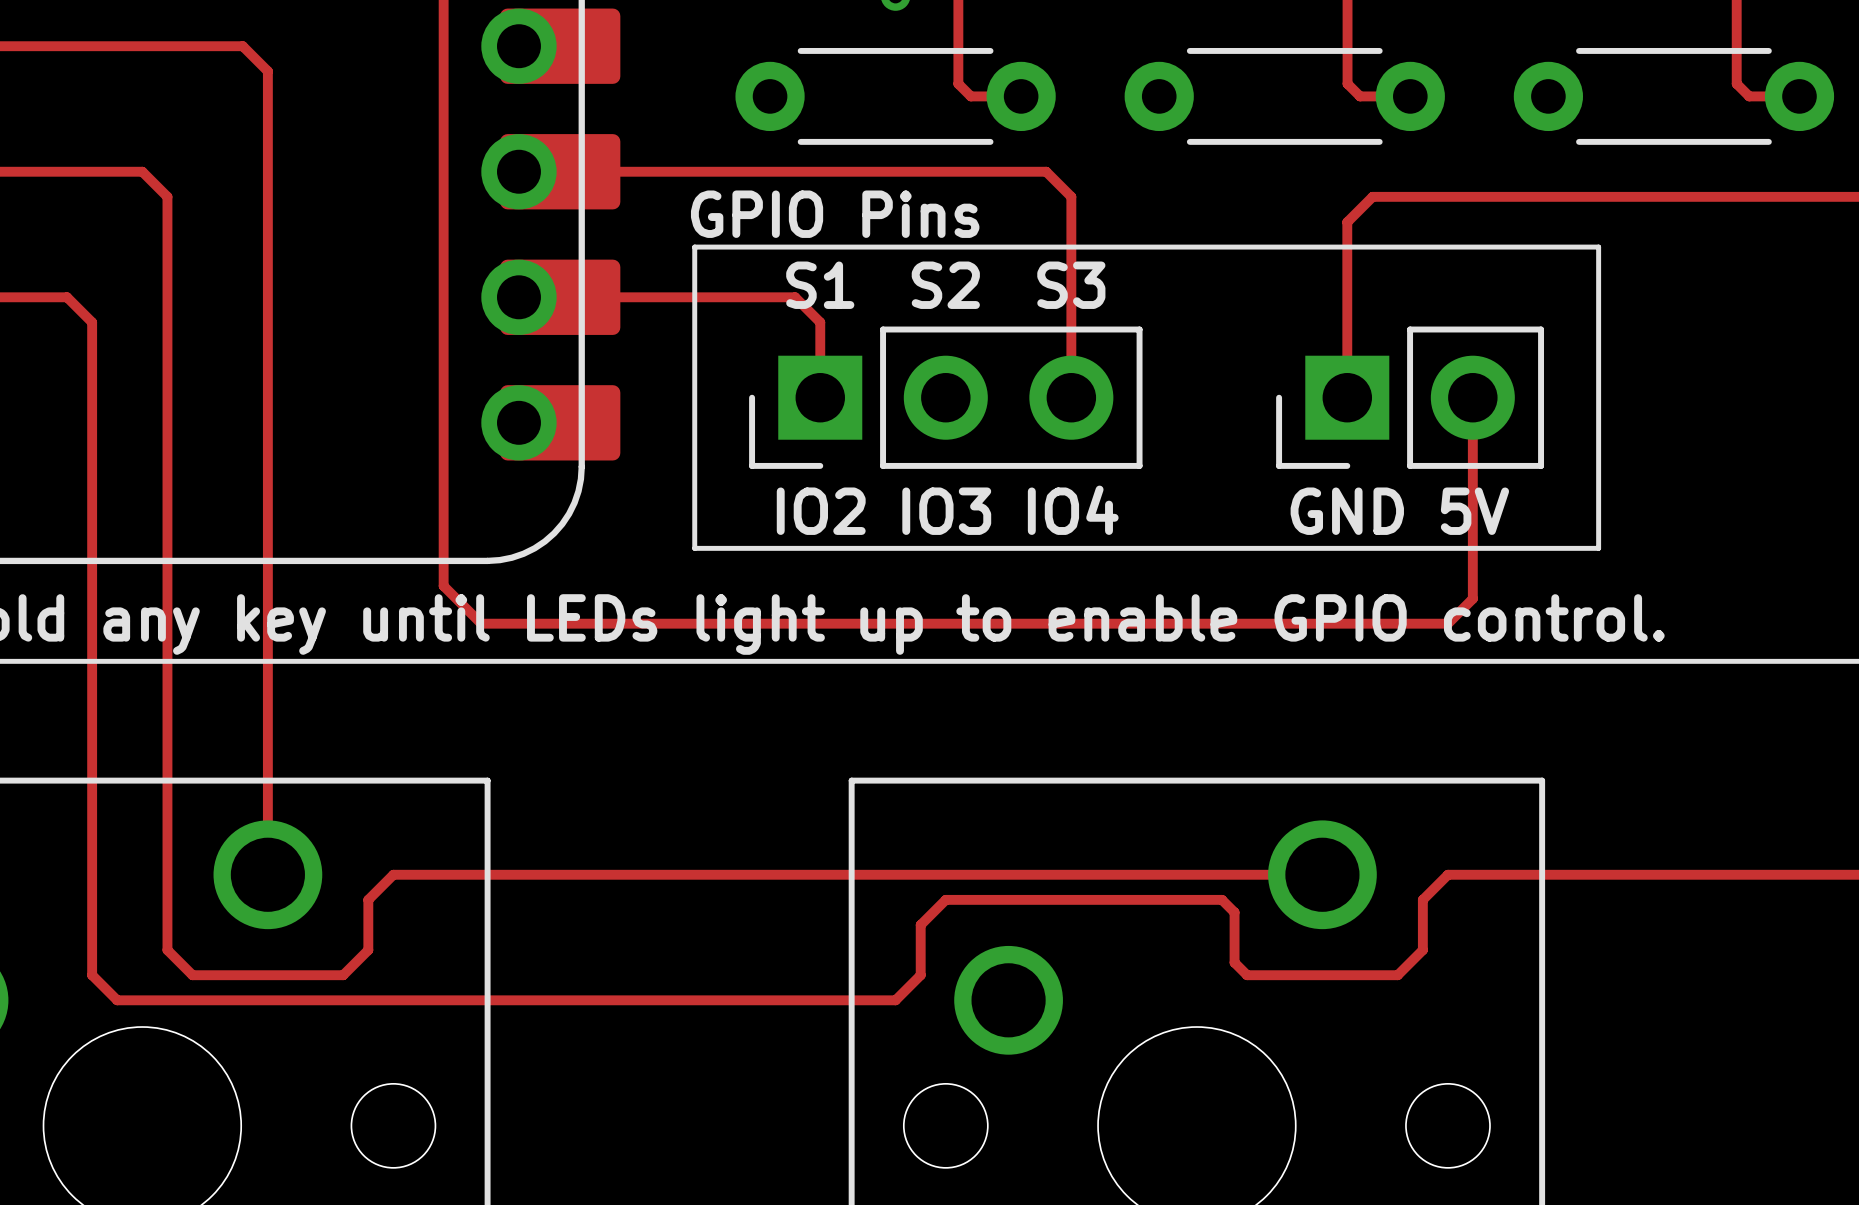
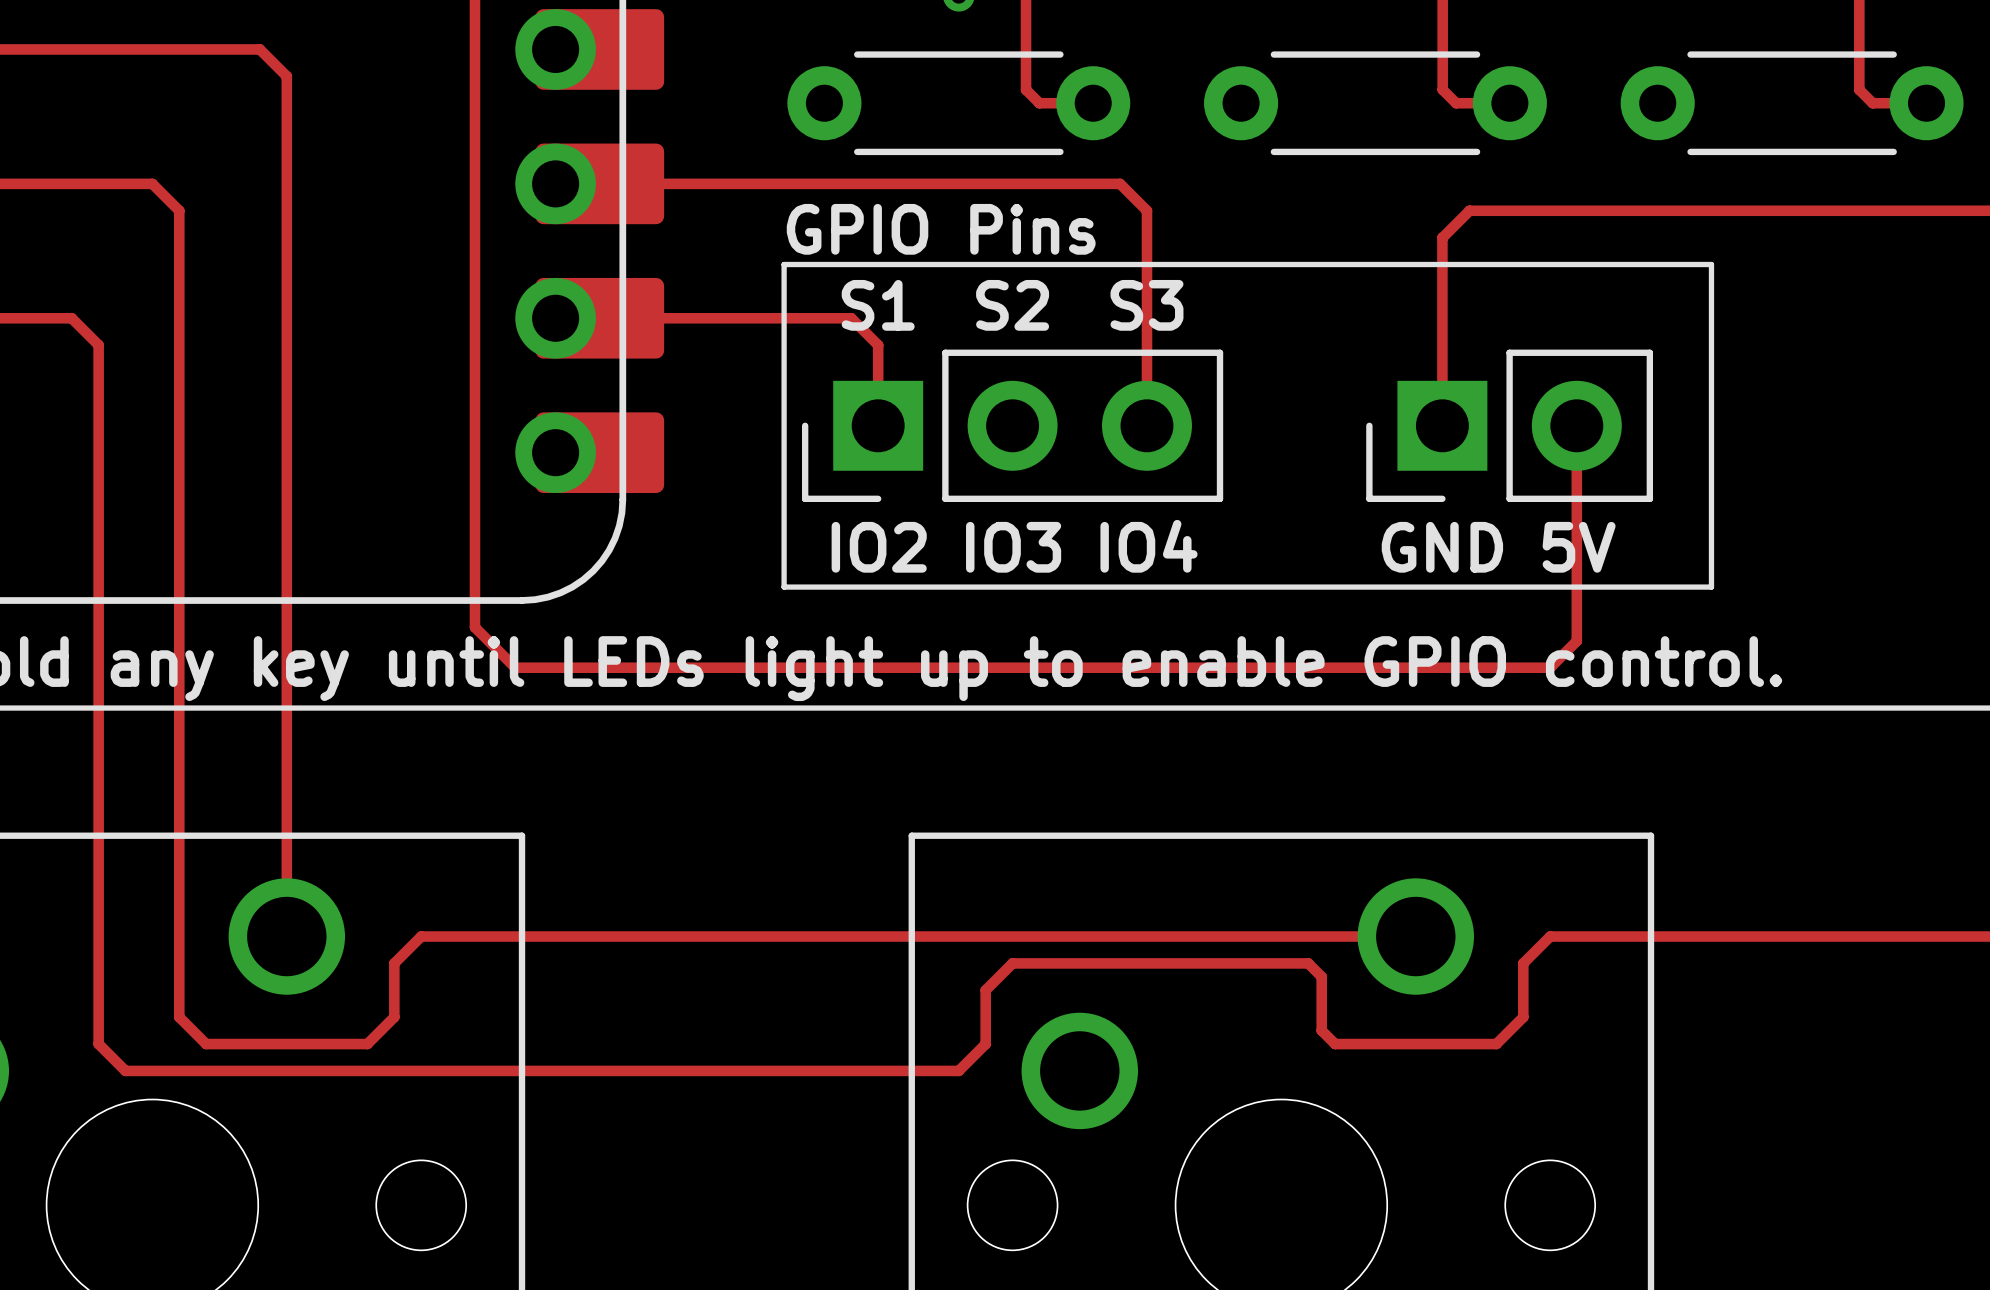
text position: GPIO Pins (835, 214) -> GPIO Pins (941, 229)
line: (732, 247) (694, 247) (694, 548) (732, 548) -> (784, 264) (784, 587)

